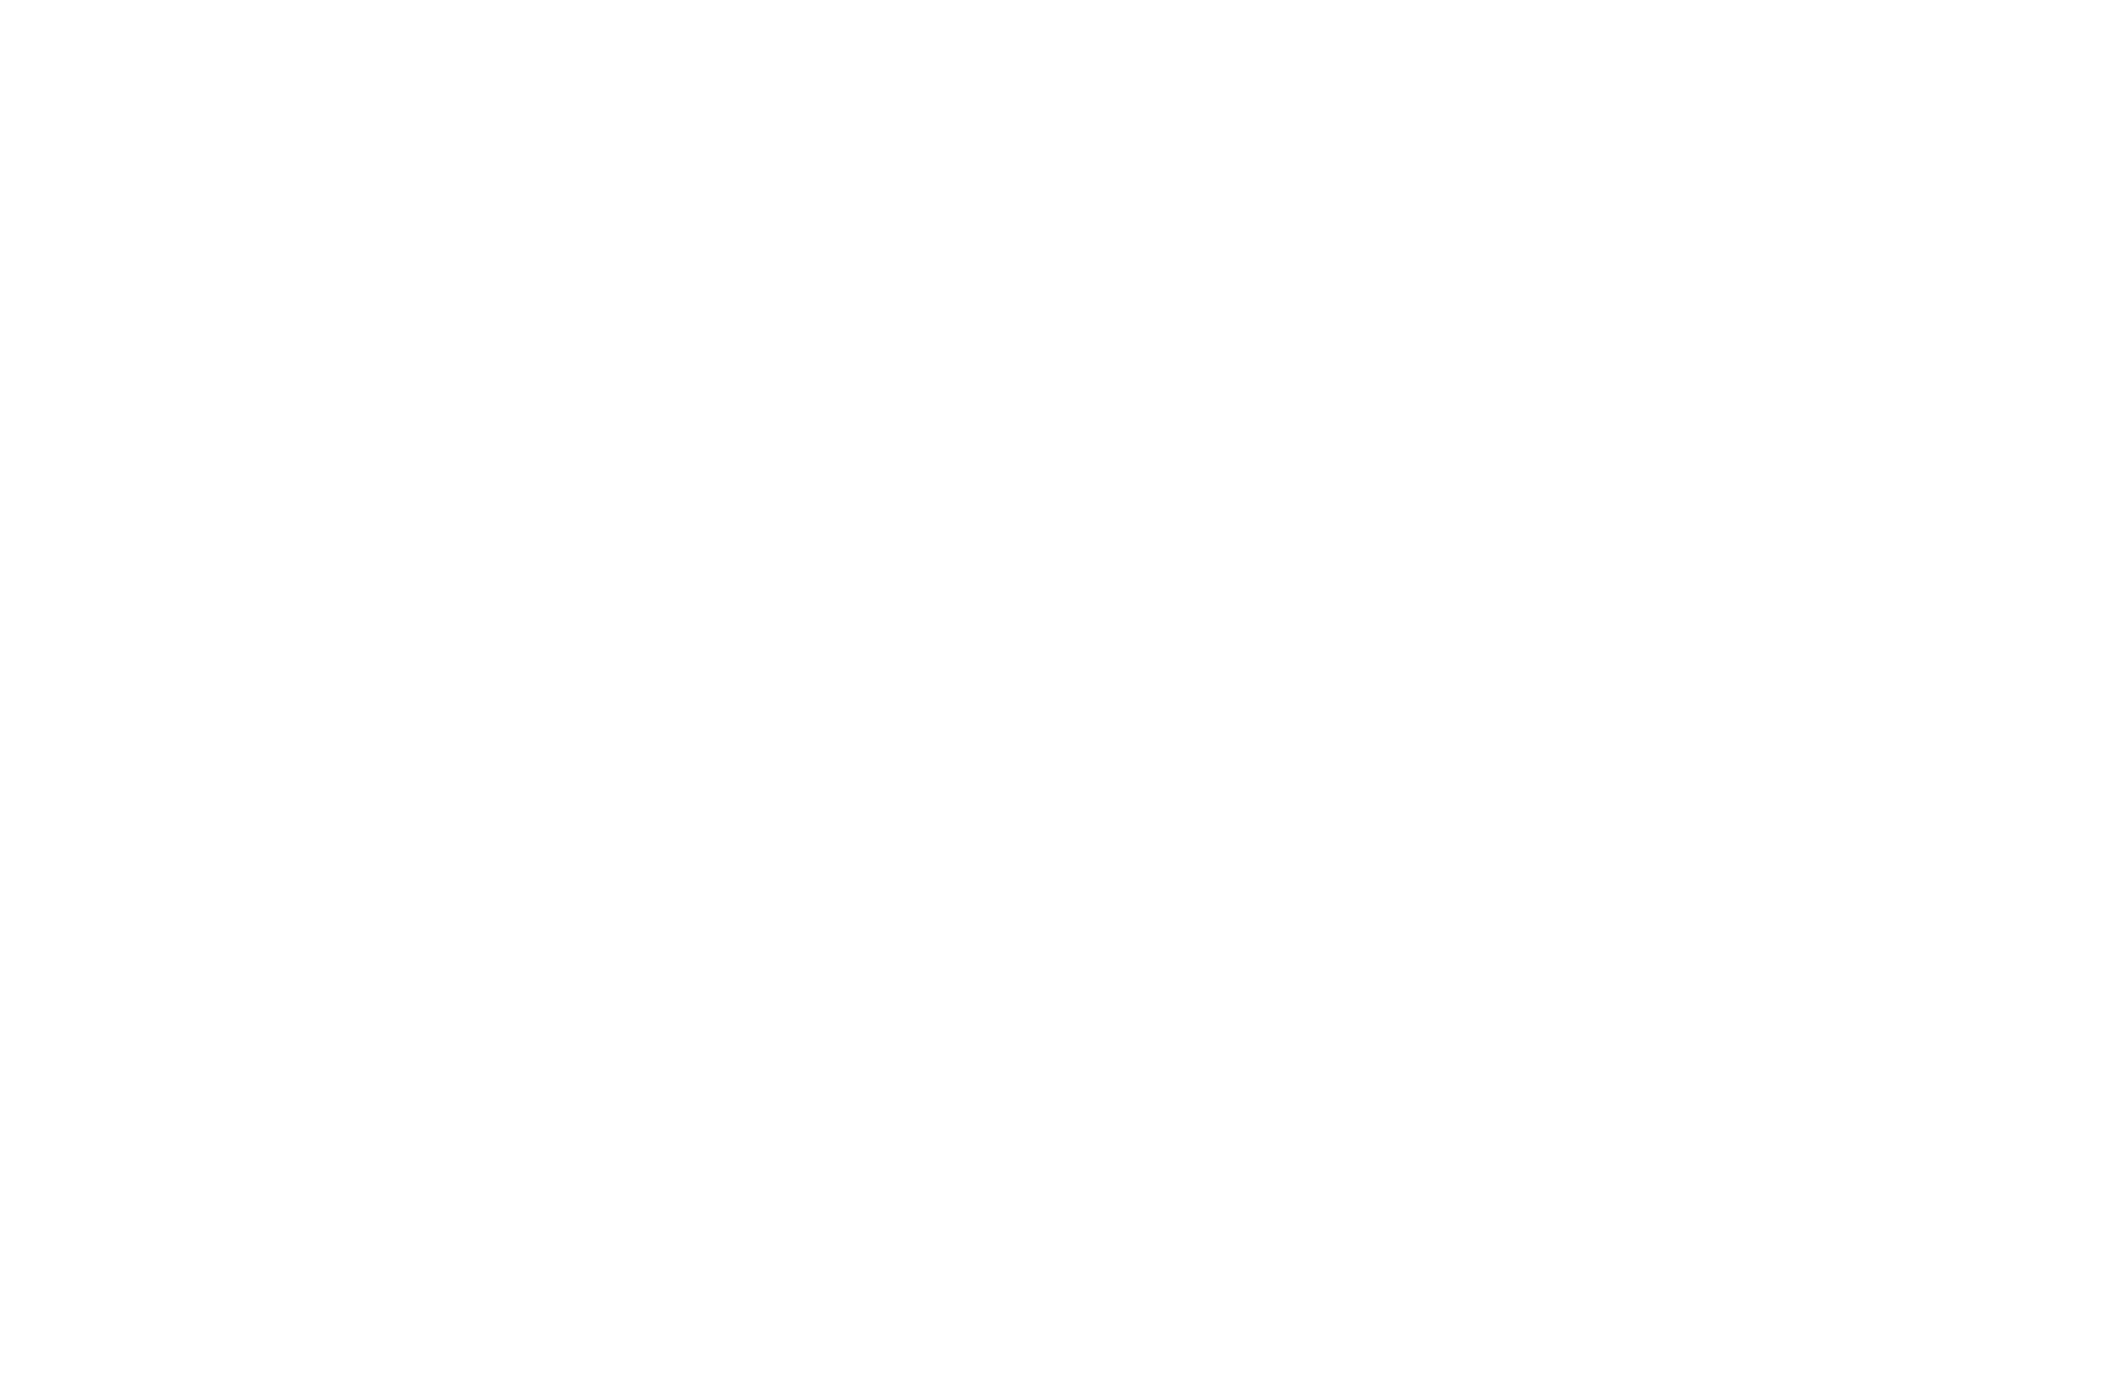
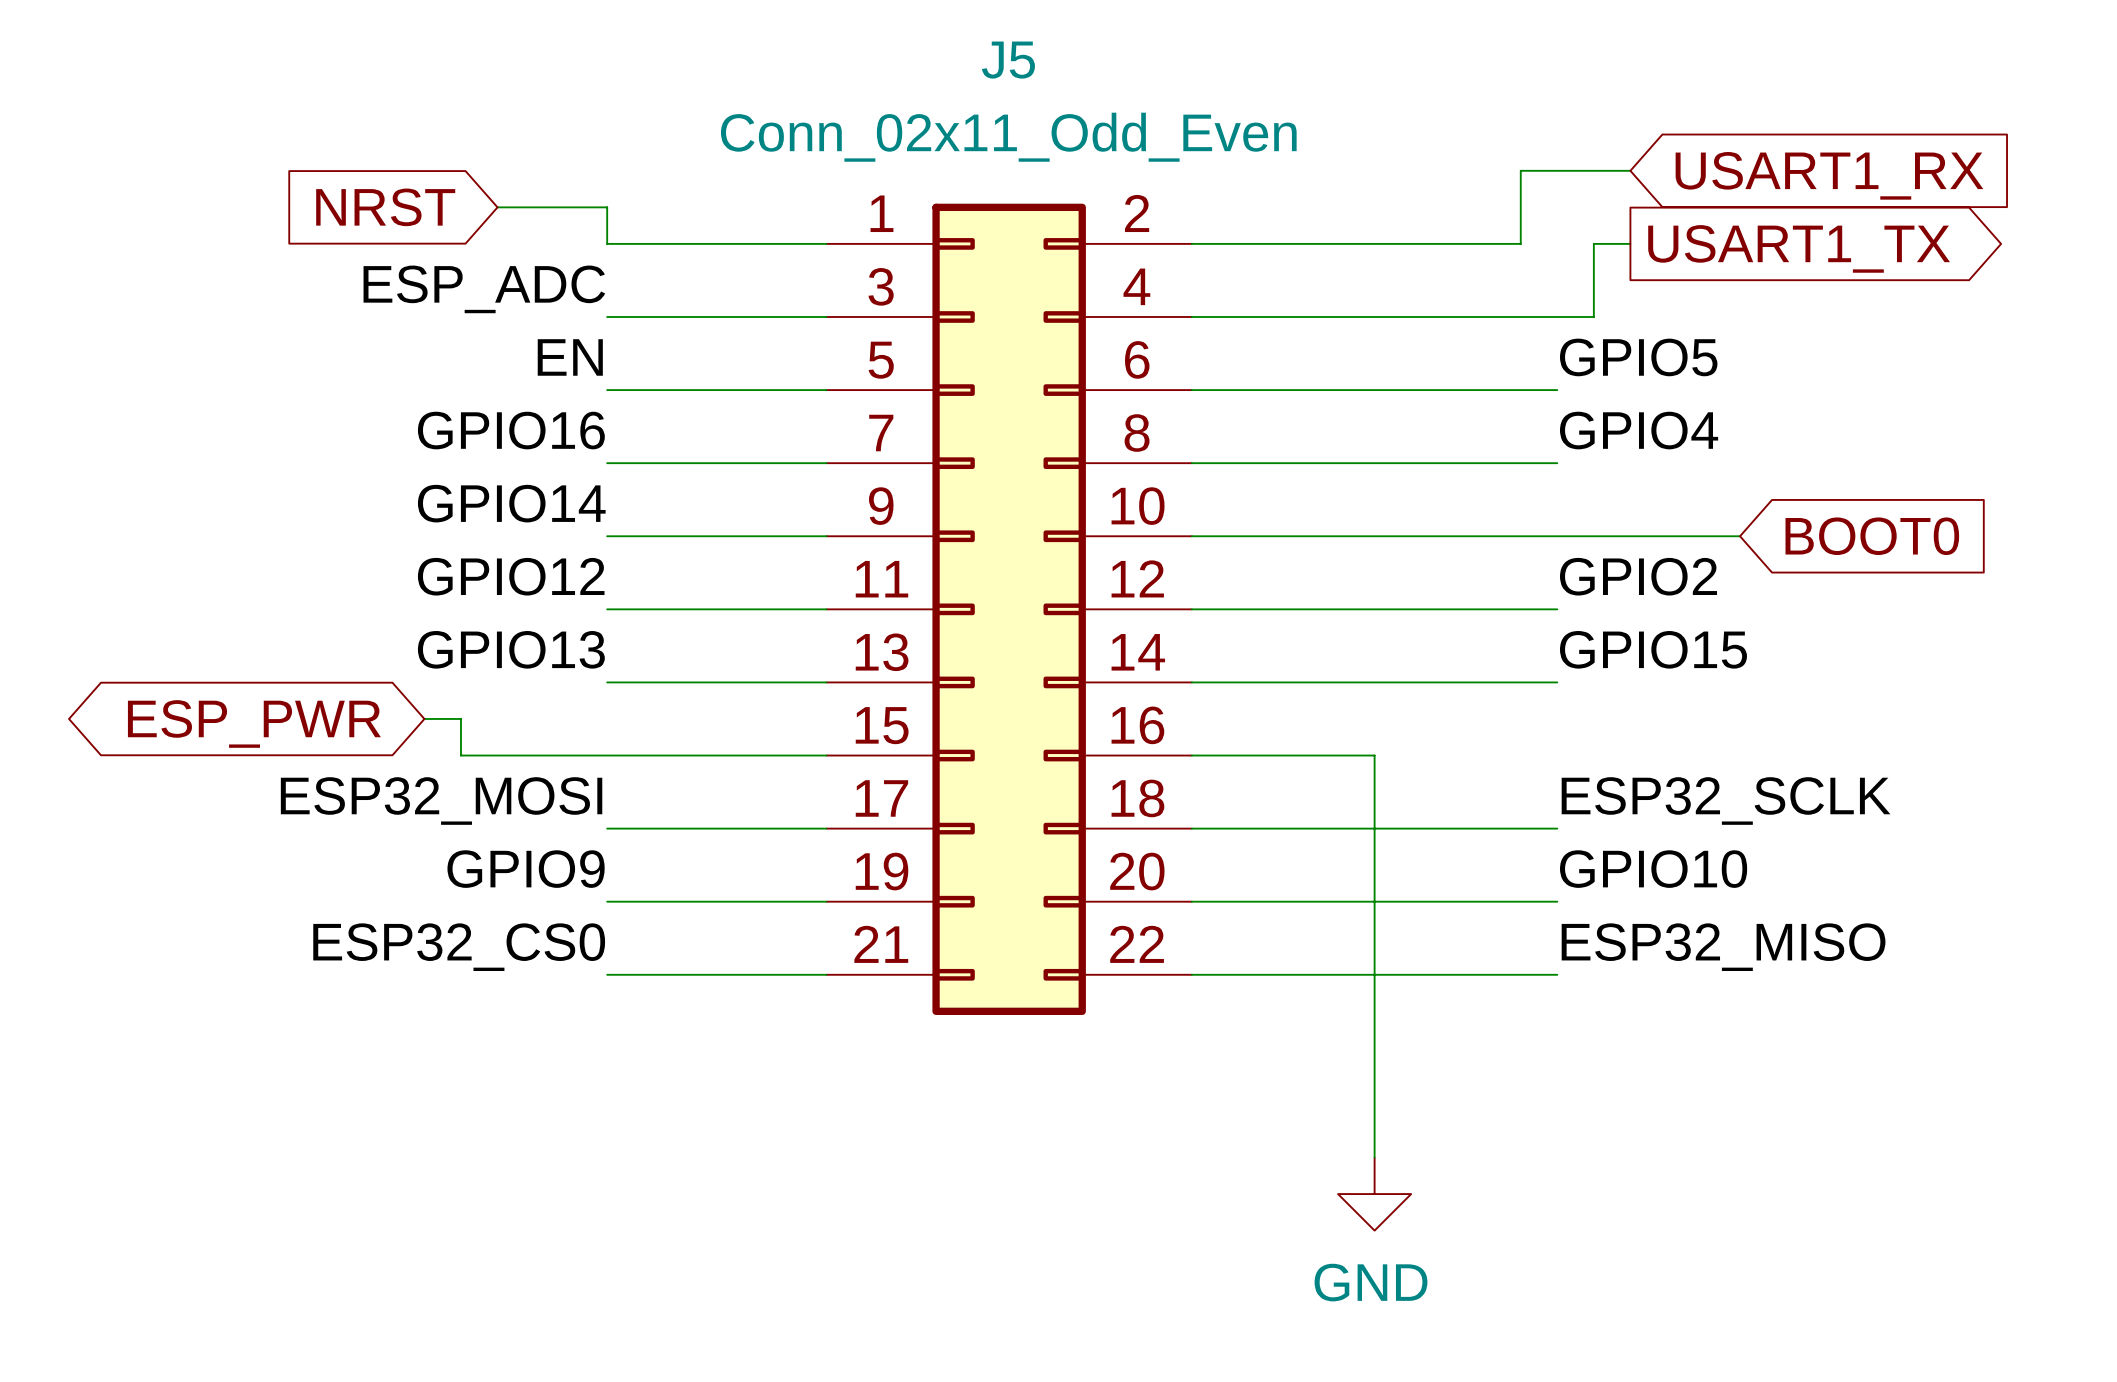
wire: none -> (1630, 170) (1520, 170) (1520, 243) (1191, 243)
global label: none -> USART1_RX (1829, 175)
global label: none -> NRST (385, 207)
wire: none -> (497, 207) (607, 207) (607, 243) (826, 243)
wire: none -> (1630, 243) (1593, 243) (1593, 316) (1191, 316)
global label: none -> USART1_TX (1799, 248)
label: none -> ESP_ADC (484, 289)
wire: none -> (607, 316) (826, 316)
label: none -> EN (570, 357)
label: none -> GPIO5 (1638, 357)
wire: none -> (607, 390) (826, 390)
wire: none -> (1191, 390) (1557, 390)
label: none -> GPIO16 (511, 430)
label: none -> GPIO4 (1639, 430)
wire: none -> (607, 463) (826, 463)
wire: none -> (1191, 463) (1557, 463)
label: none -> GPIO14 (511, 503)
wire: none -> (607, 536) (826, 536)
wire: none -> (1191, 536) (1740, 536)
global label: none -> BOOT0 (1872, 536)
label: none -> GPIO12 (511, 576)
label: none -> GPIO2 (1638, 576)
wire: none -> (607, 609) (826, 609)
J5: none -> Conn_02x11_Odd_Even (1009, 609)
wire: none -> (1191, 609) (1557, 609)
label: none -> GPIO13 (511, 649)
label: none -> GPIO15 (1653, 649)
wire: none -> (607, 682) (826, 682)
wire: none -> (1191, 682) (1557, 682)
wire: none -> (424, 718) (460, 718) (460, 755) (826, 755)
global label: none -> ESP_PWR (254, 723)
wire: none -> (1191, 755) (1374, 755) (1374, 1157)
label: none -> ESP32_MOSI (441, 801)
label: none -> ESP32_SCLK (1726, 801)
wire: none -> (607, 828) (826, 828)
wire: none -> (1191, 828) (1557, 828)
label: none -> GPIO9 (526, 869)
label: none -> GPIO10 (1653, 869)
wire: none -> (607, 901) (826, 901)
wire: none -> (1191, 901) (1557, 901)
label: none -> ESP32_CS0 (459, 947)
label: none -> ESP32_MISO (1723, 947)
wire: none -> (607, 974) (826, 974)
wire: none -> (1191, 974) (1557, 974)
power symbol: none -> GND (1374, 1194)

